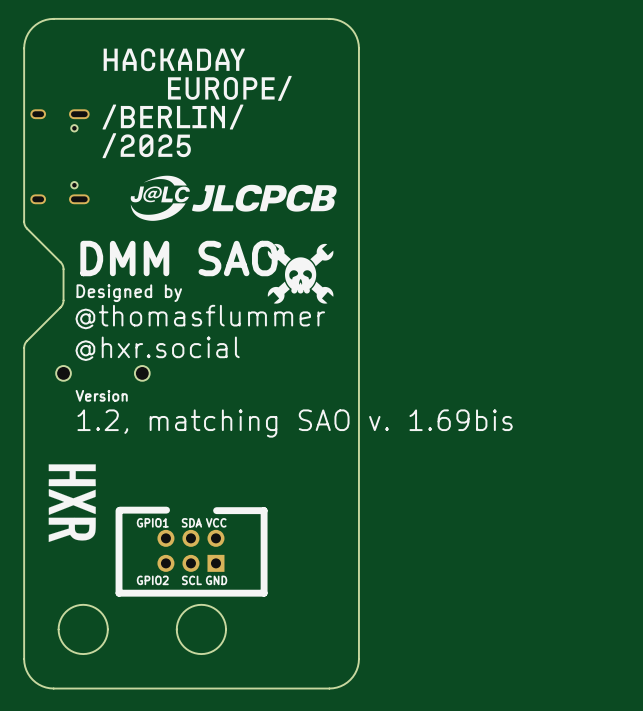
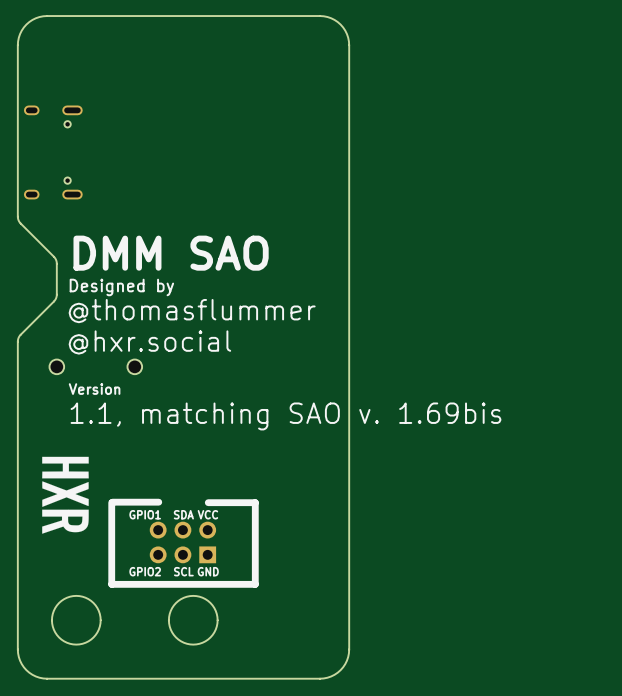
drawing: [102, 48, 292, 159] -> none
drawing: [130, 175, 337, 221] -> none
drawing: [267, 243, 334, 304] -> none
text: 1.2, matching SAO v. 1.69bis (295, 423) -> 1.1, matching SAO v. 1.69bis (285, 416)

